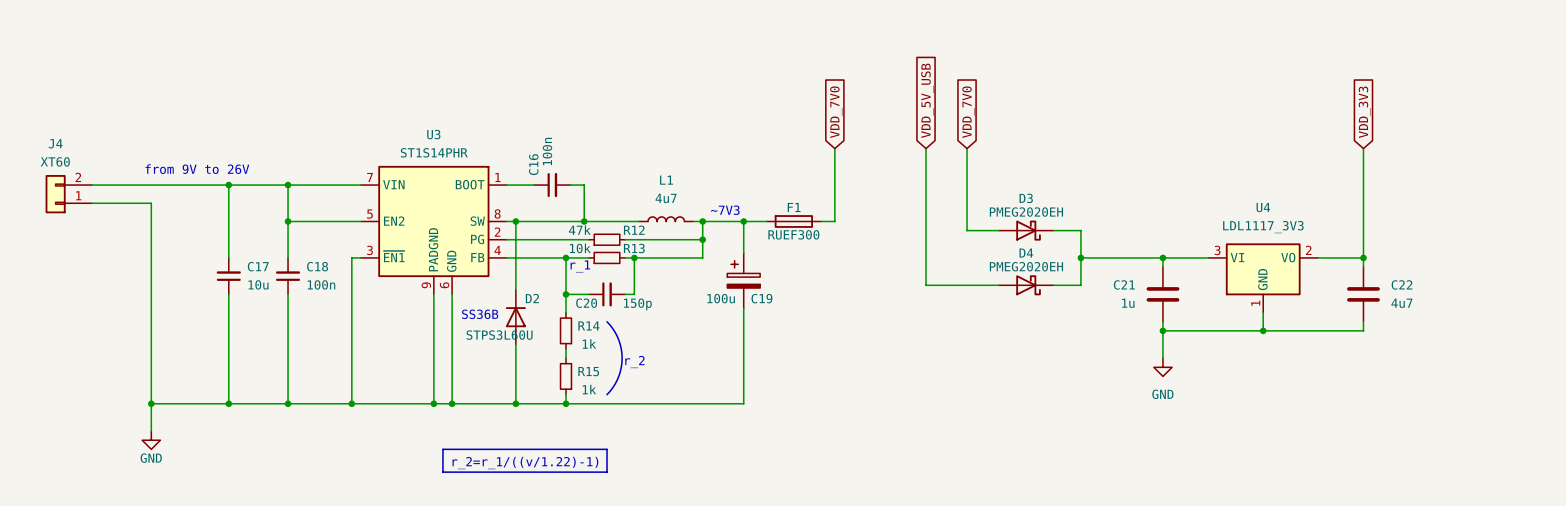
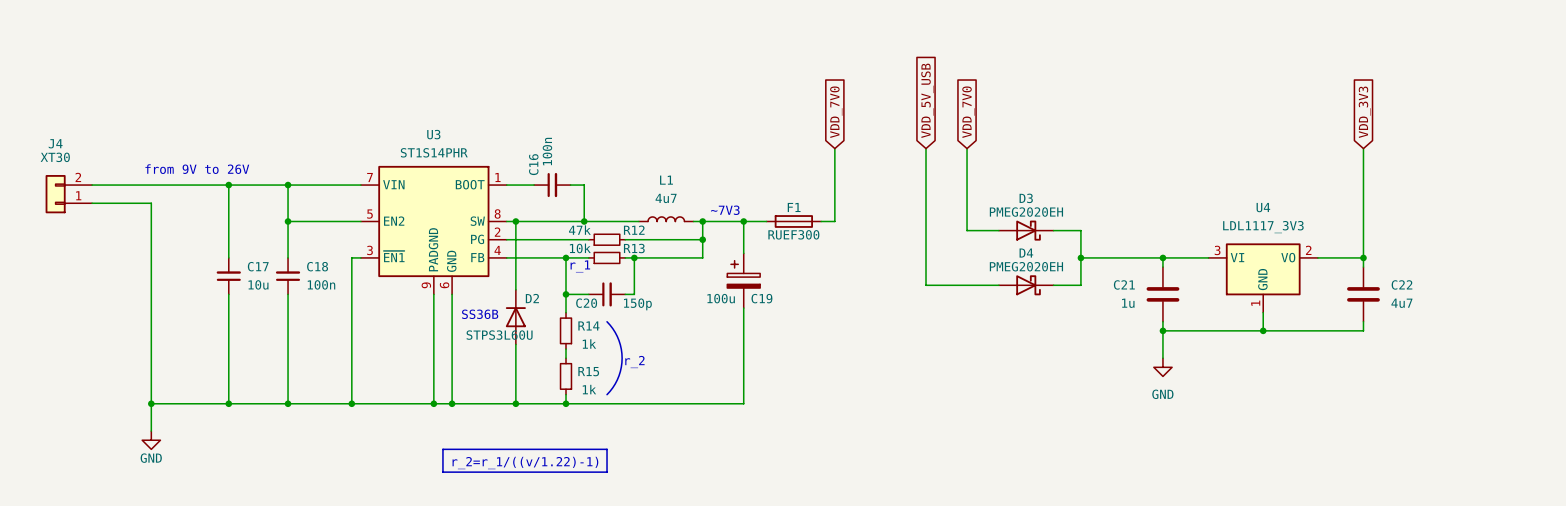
J4 value: XT60 (55, 161) -> XT30 (55, 157)

